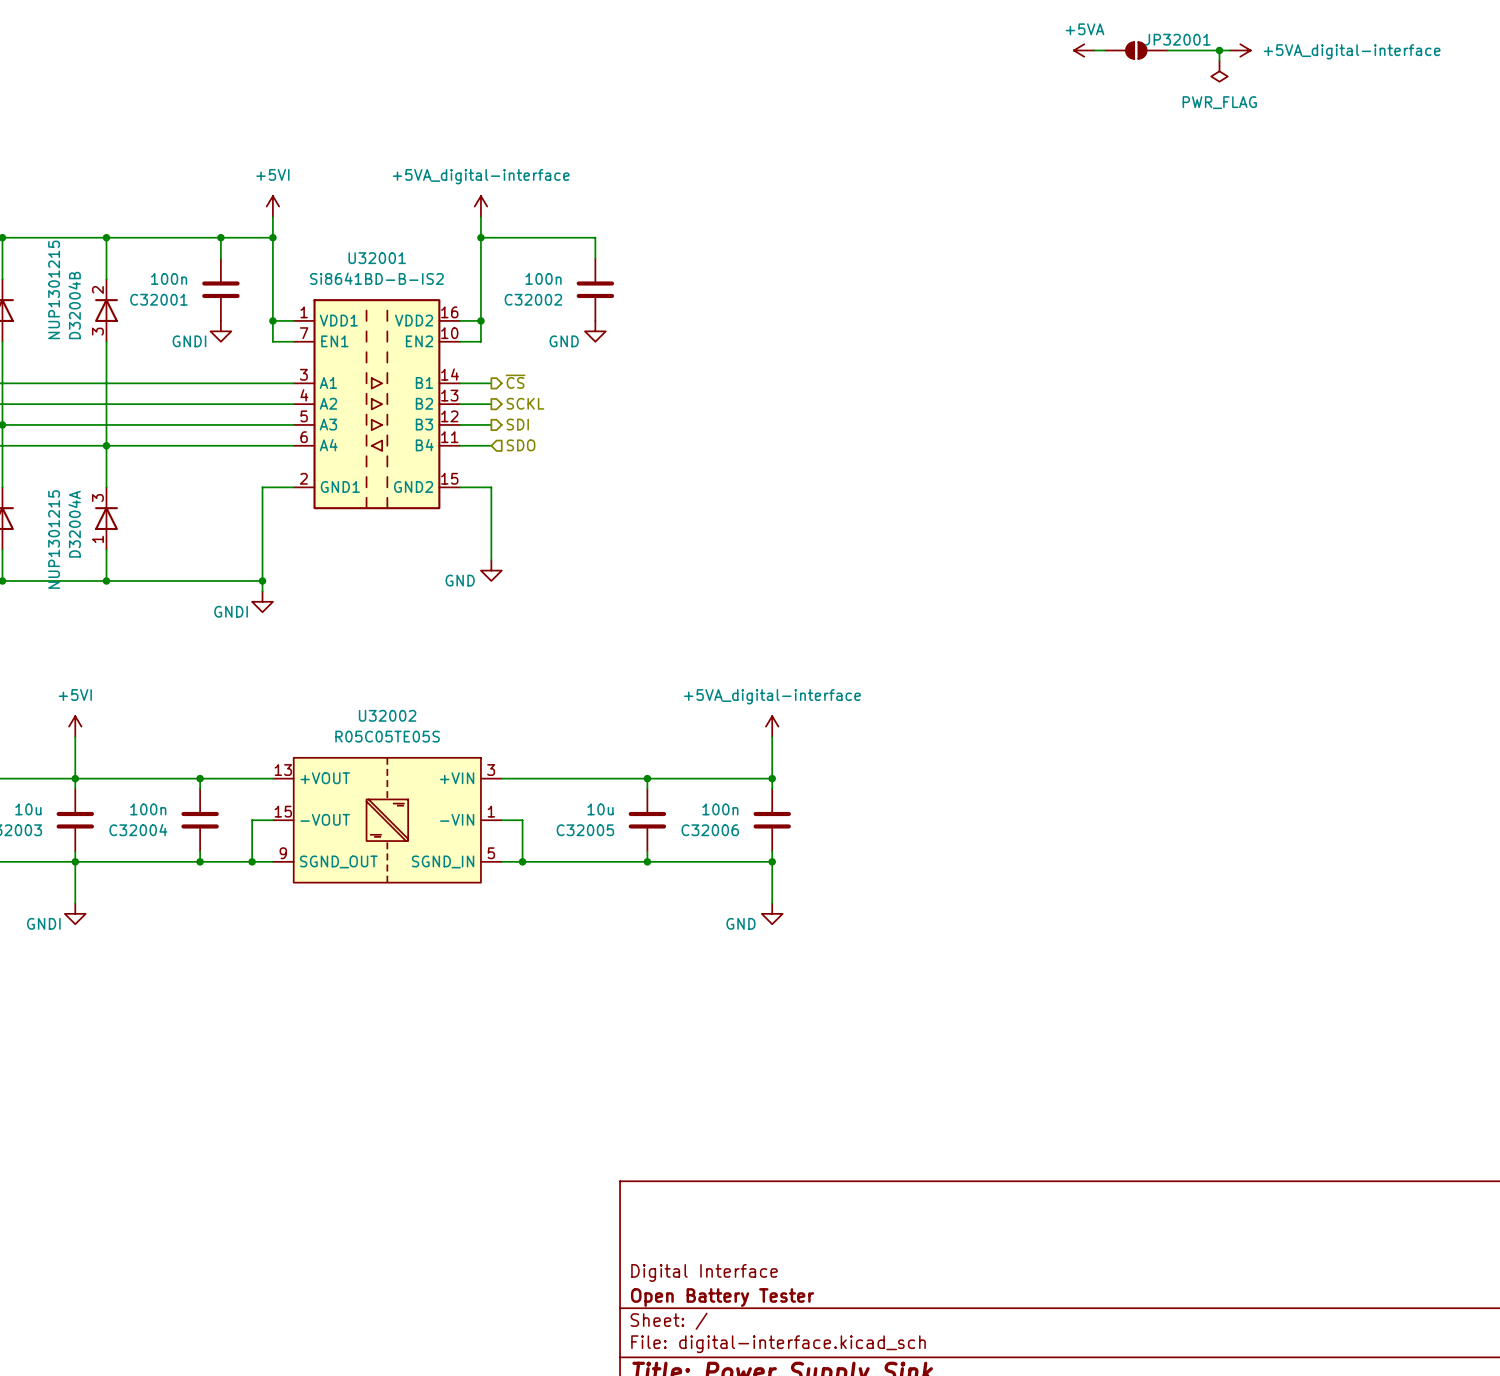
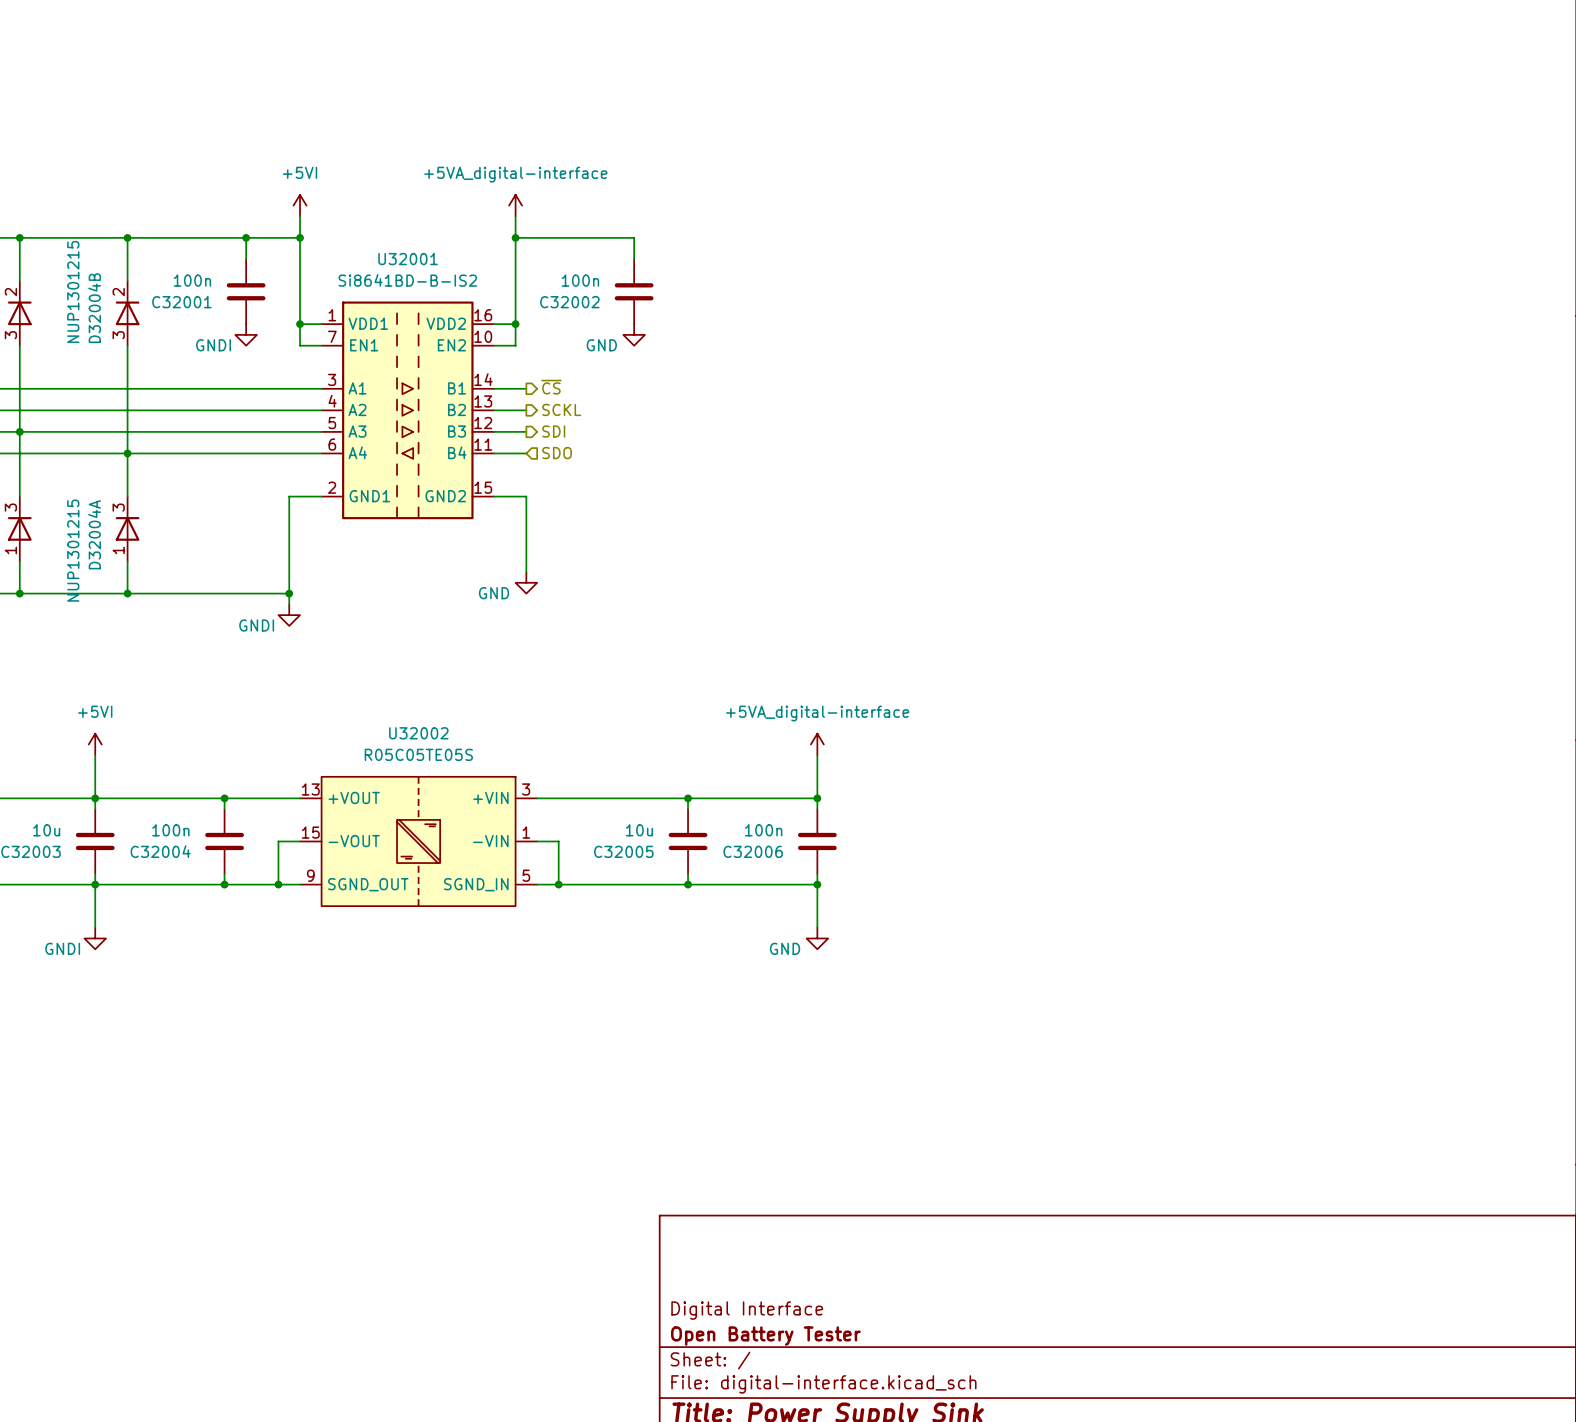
power symbol: +5VA (1084, 50) -> none
wire: (1094, 50) (1105, 50) -> none
JP32001: (1136, 50) -> none
wire: (1167, 50) (1229, 50) -> none
wire: (1219, 50) (1219, 60) -> none
junction: (1219, 50) -> none
power symbol: +5VA_digital-interface (1240, 50) -> none
power symbol: PWR_FLAG (1219, 71) -> none

